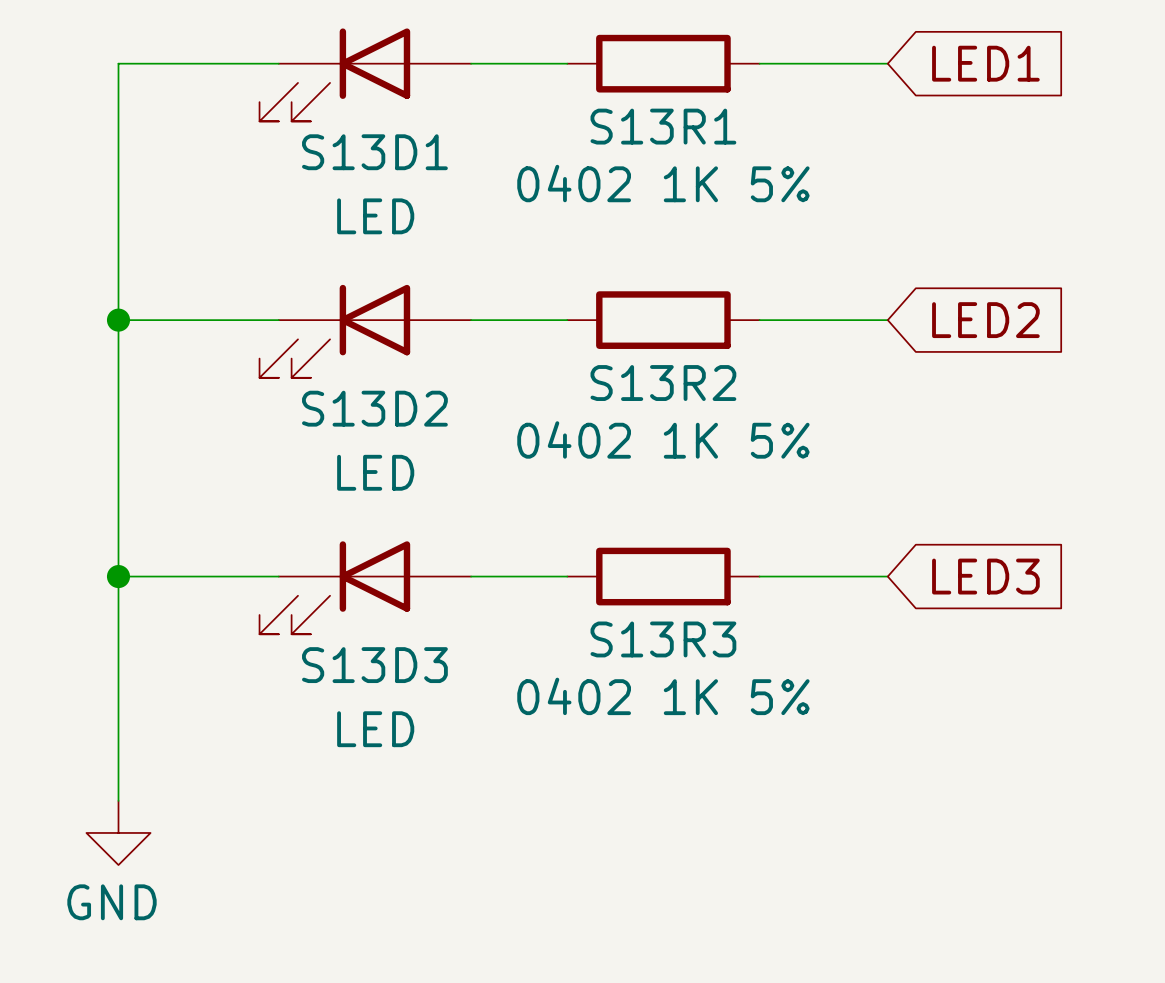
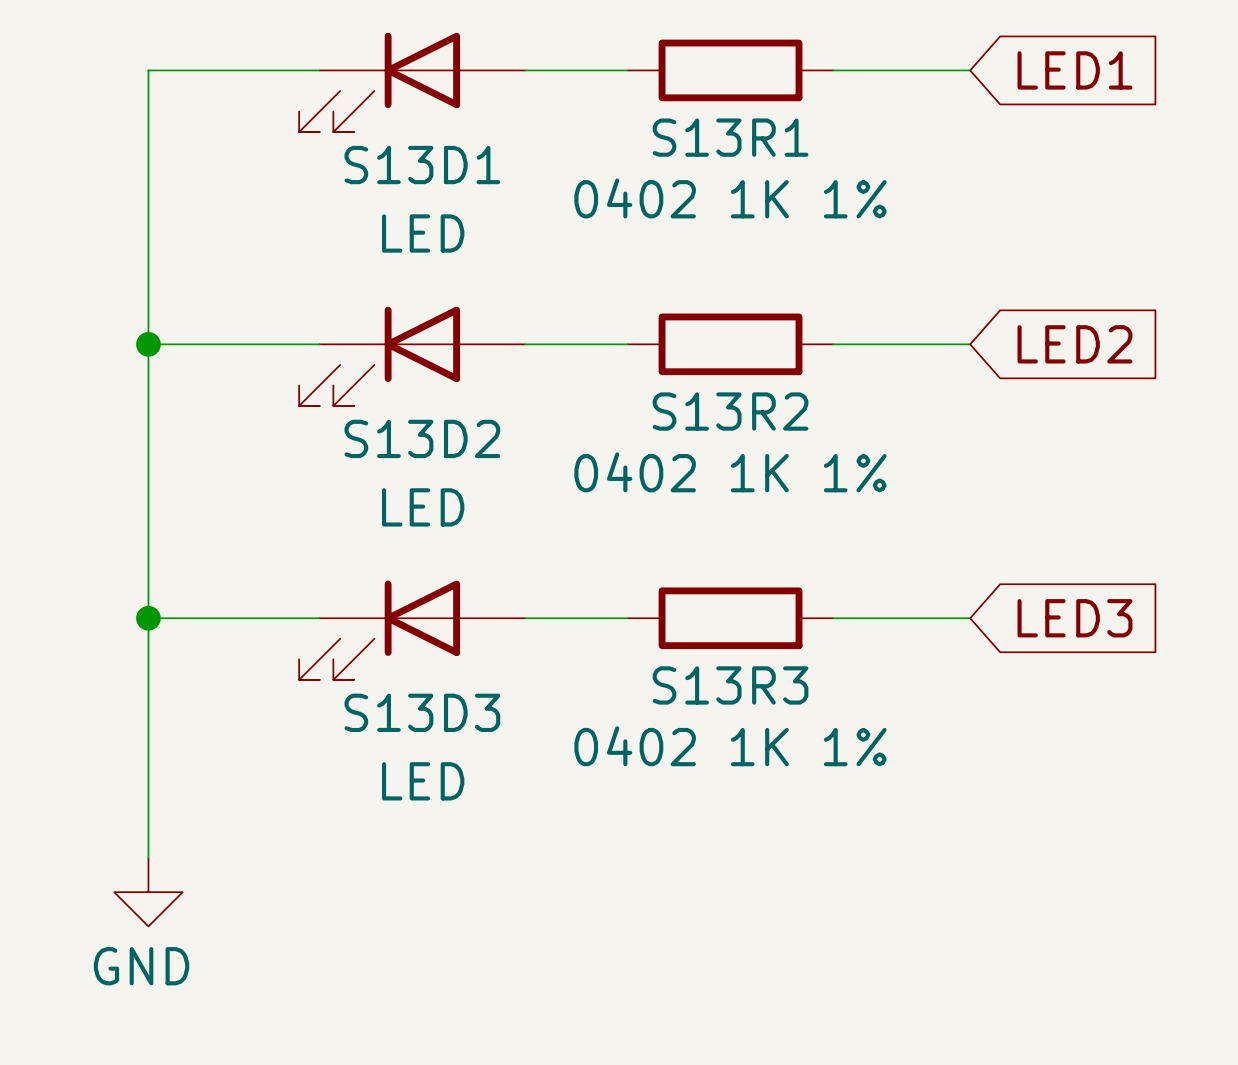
S13R1 value: 0402 1K 5% (663, 183) -> 0402 1K 1% (730, 198)
S13R2 value: 0402 1K 5% (663, 439) -> 0402 1K 1% (730, 472)
S13R3 value: 0402 1K 5% (663, 696) -> 0402 1K 1% (730, 746)

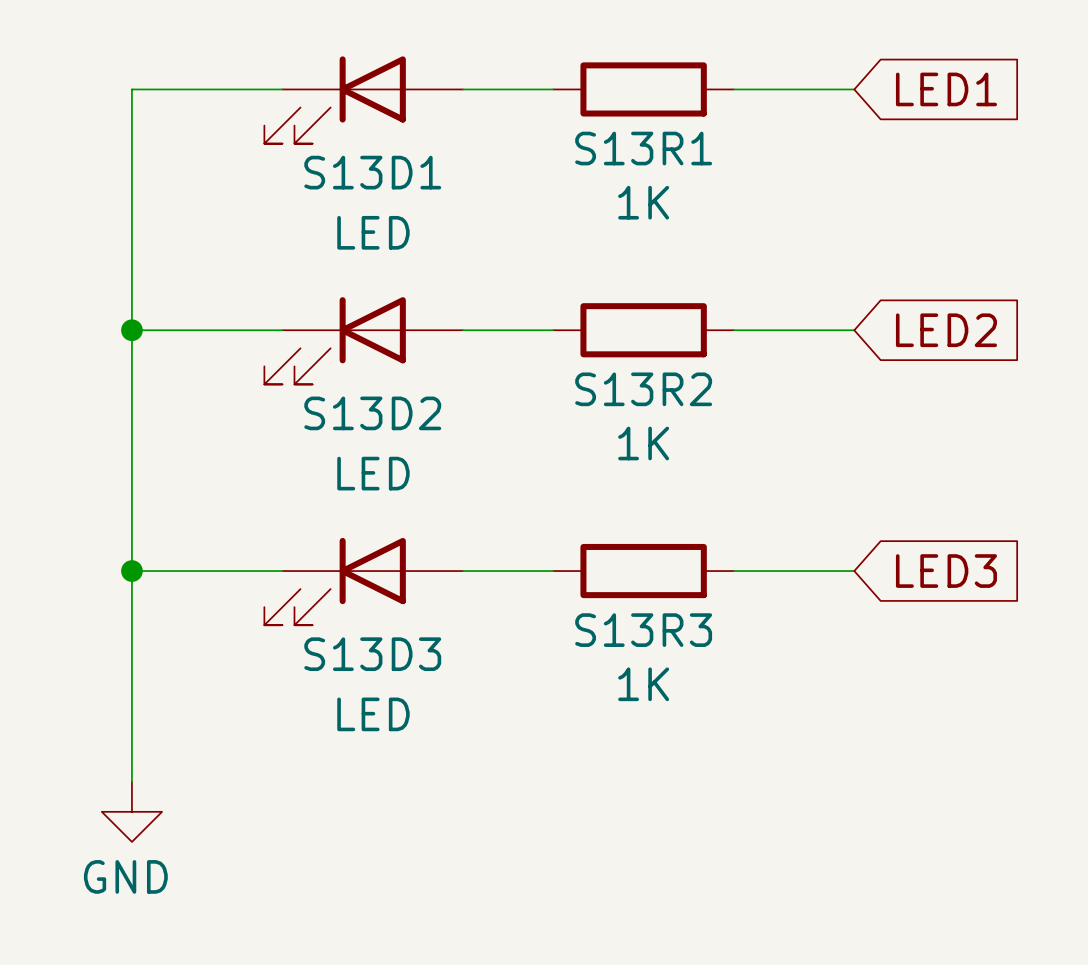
S13R1 value: 0402 1K 1% (730, 198) -> 1K (643, 202)
S13R2 value: 0402 1K 1% (730, 472) -> 1K (643, 443)
S13R3 value: 0402 1K 1% (730, 746) -> 1K (643, 684)

